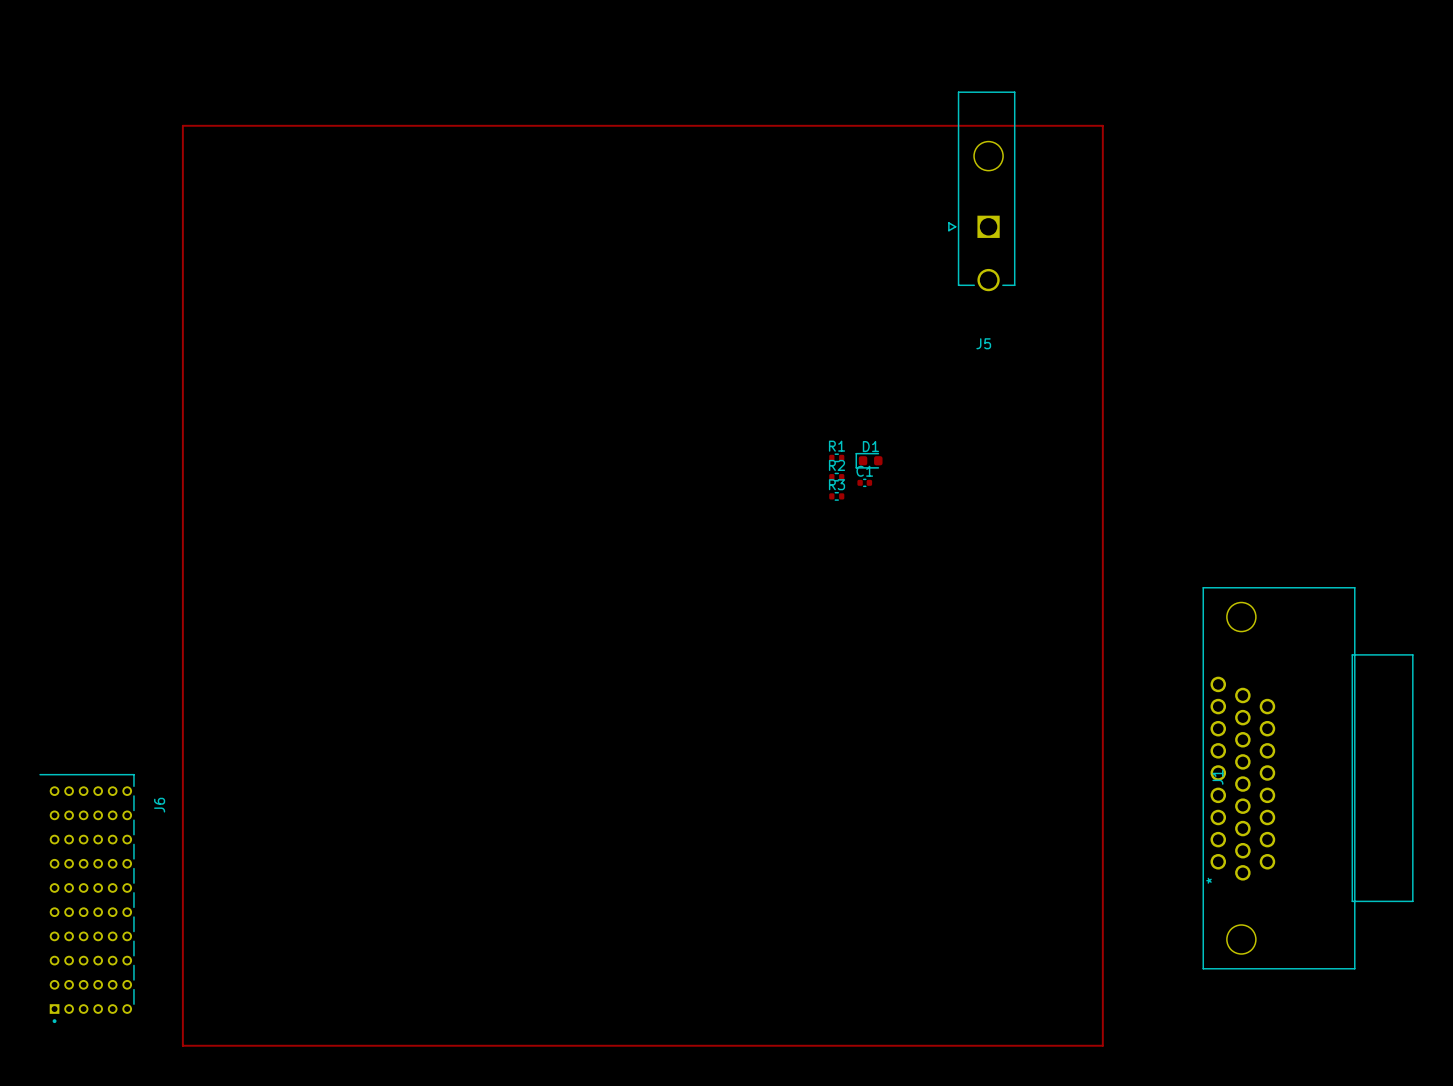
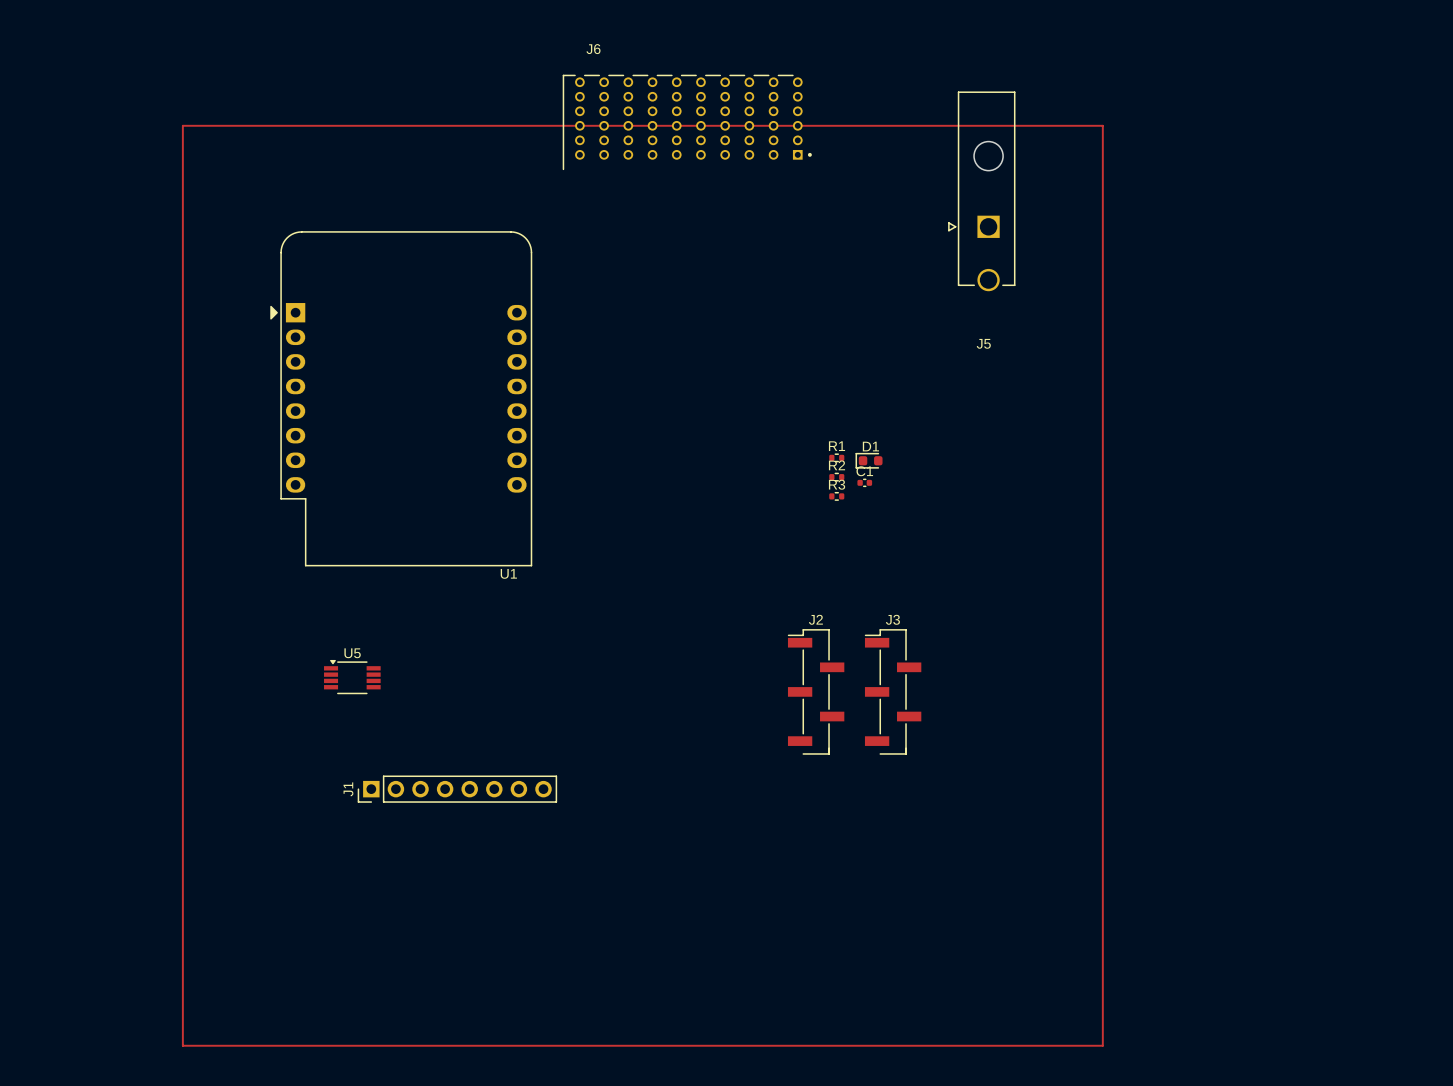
U1: none -> (401, 398)
J1 footprint: [1202, 587, 1414, 970] -> [357, 775, 557, 803]
U5: none -> (352, 677)
J2: none -> (816, 691)
J3: none -> (893, 691)
J6 rotation: 0° (87, 898) -> 90° counterclockwise (687, 122)
J6 position: (87, 898) -> (687, 122)

